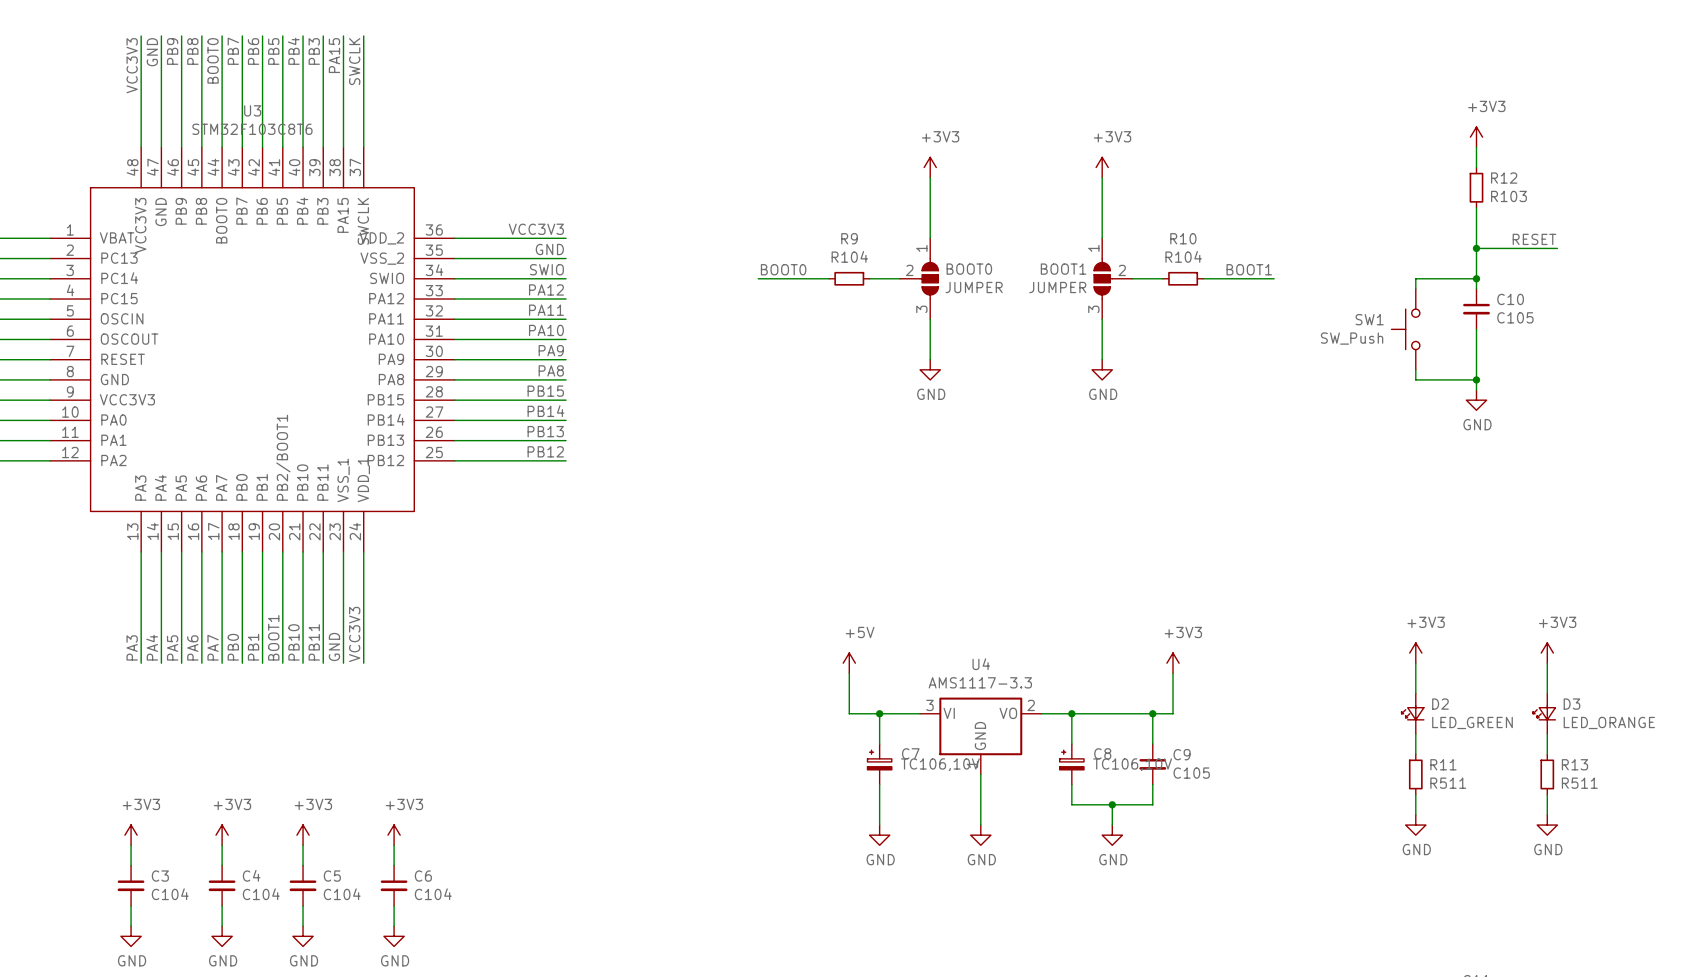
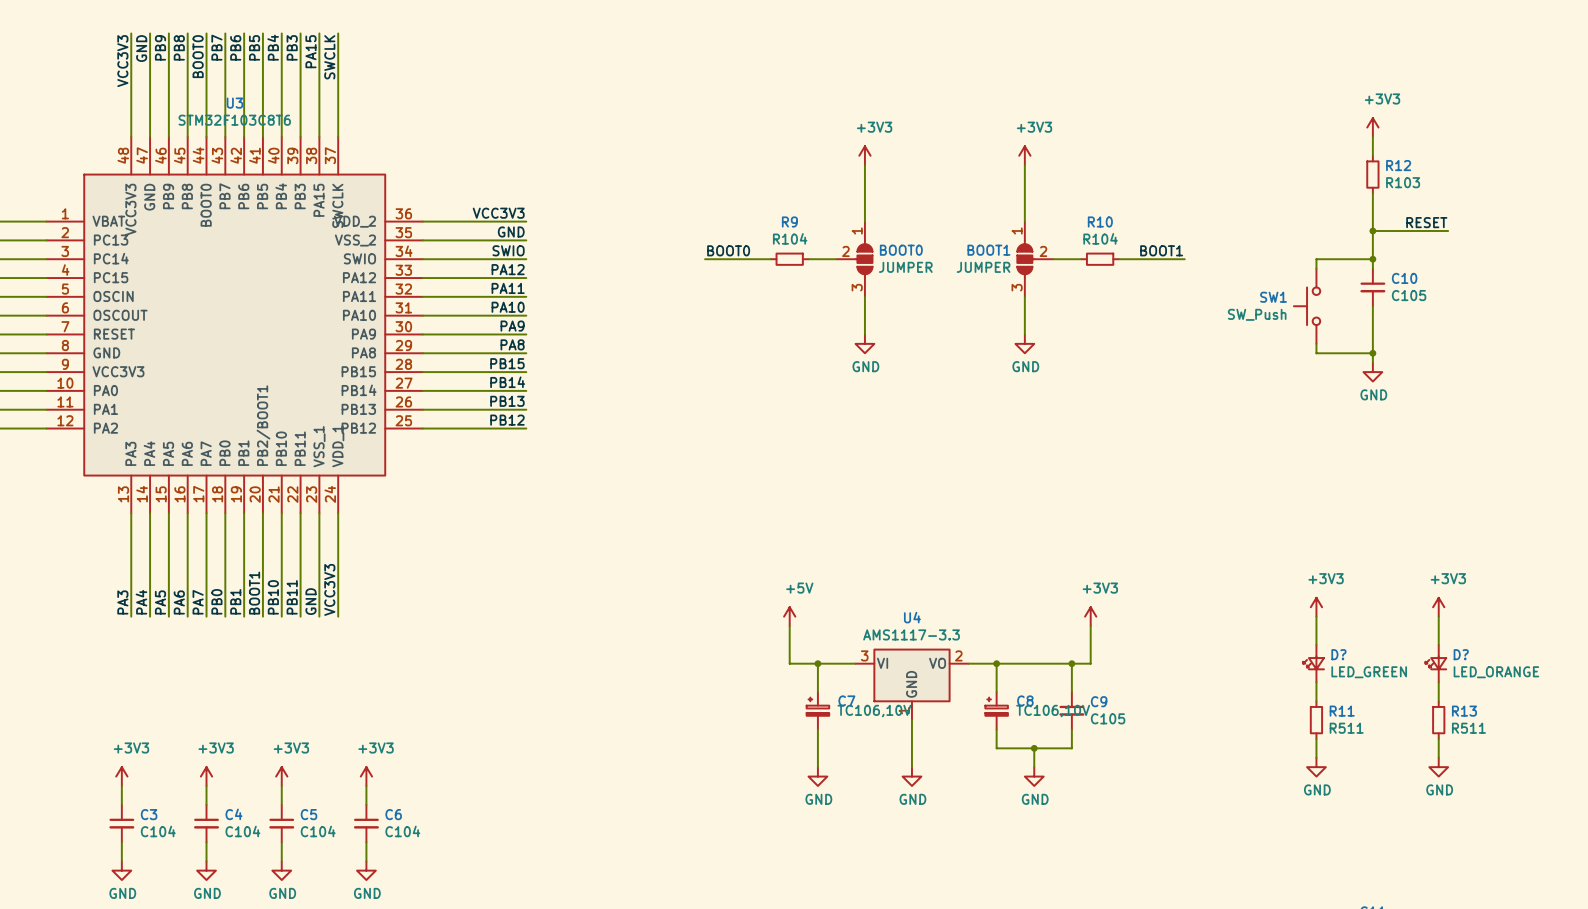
D2 name: D2 (1440, 704) -> D? (1338, 654)
D3 name: D3 (1571, 704) -> D? (1461, 654)

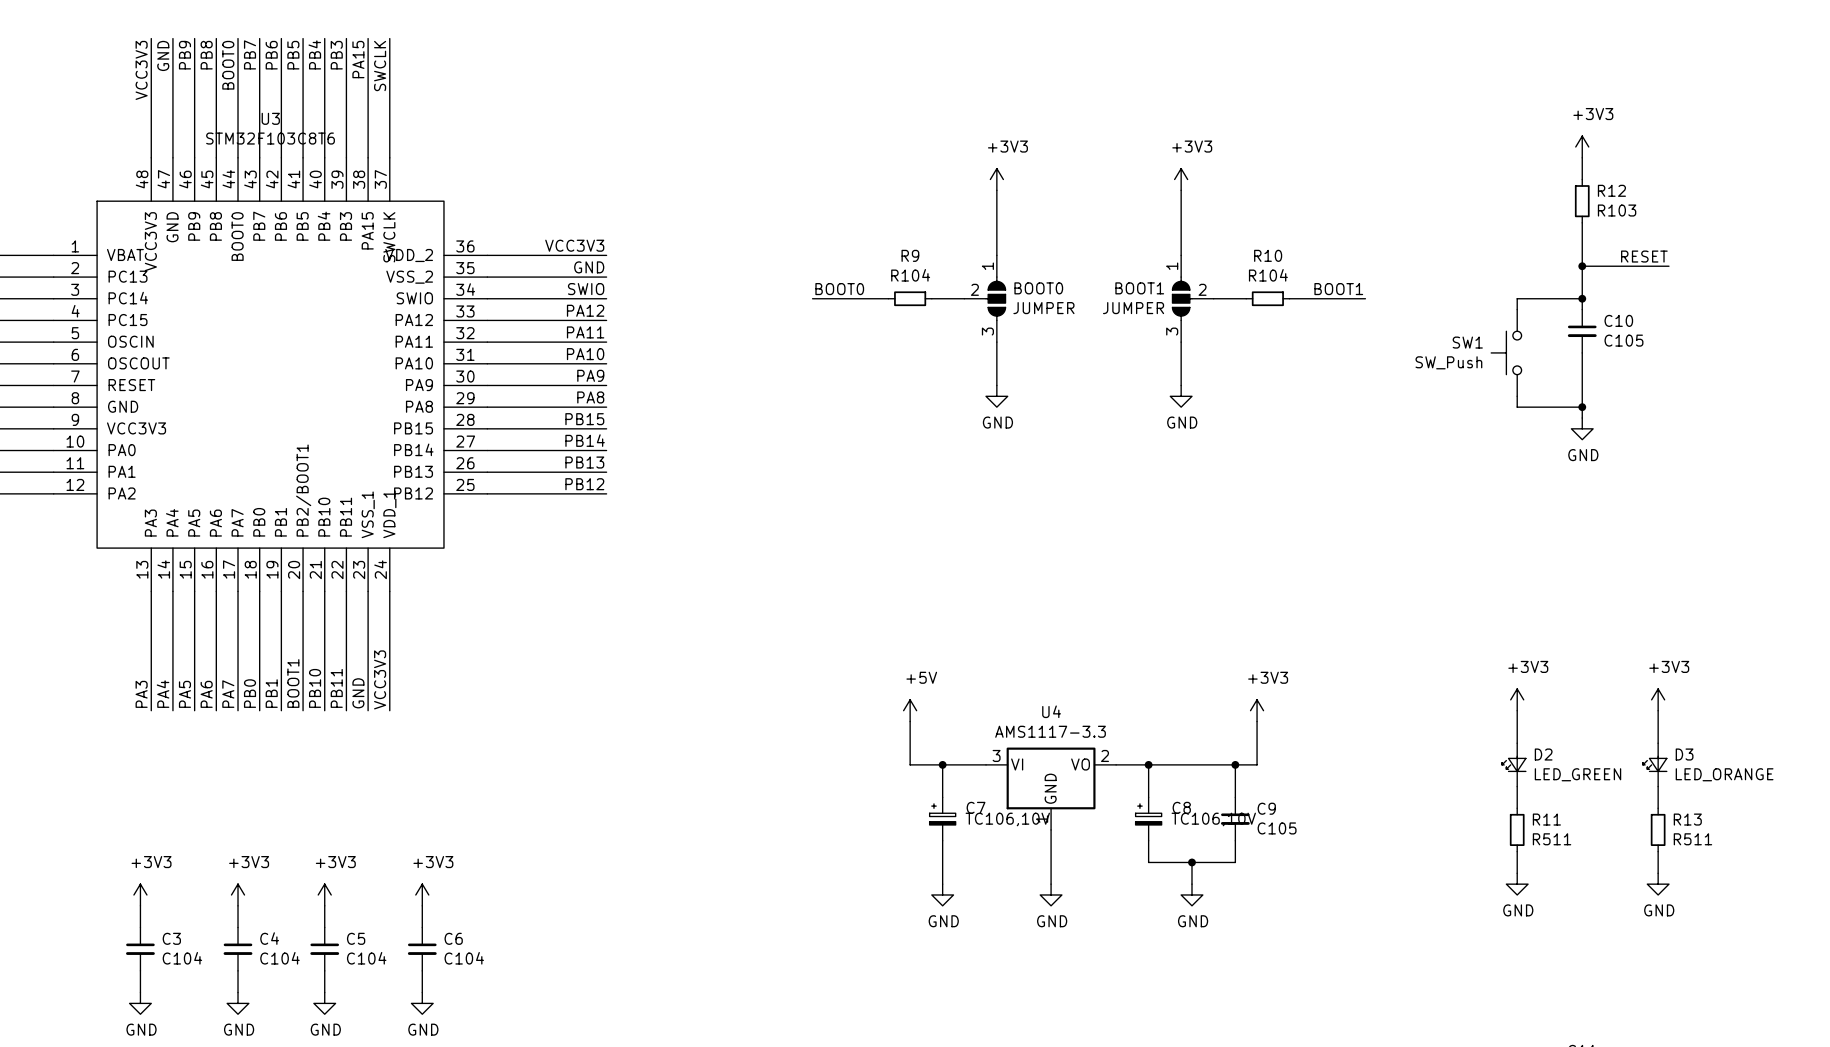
D? name: D? (1338, 654) -> D2 (1543, 754)
D? name: D? (1461, 654) -> D3 (1684, 754)

